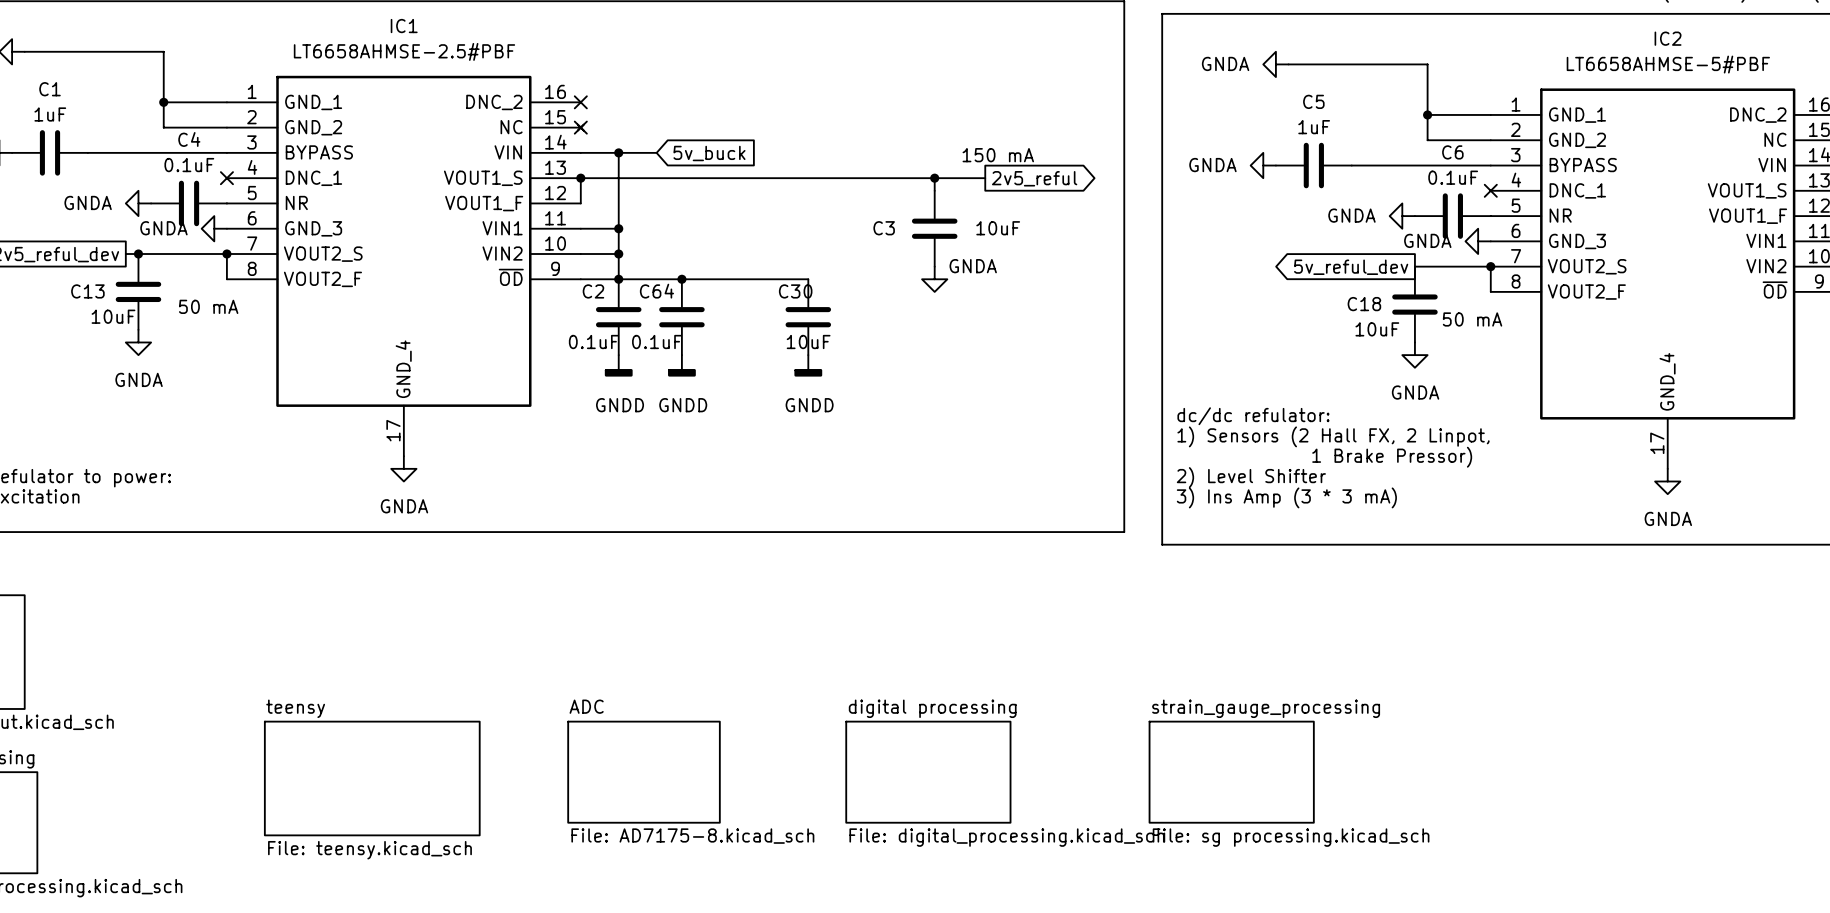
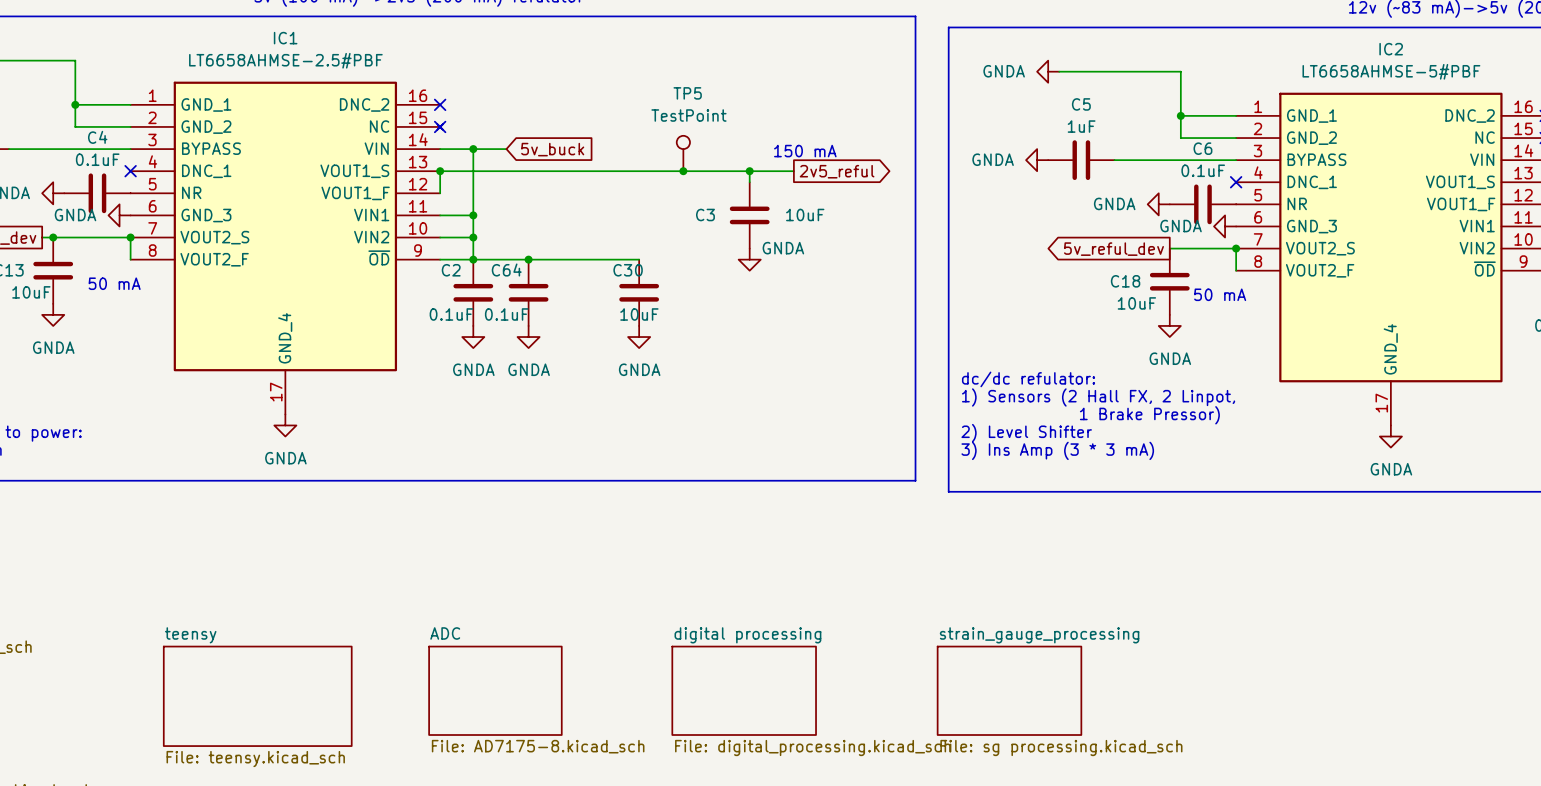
TP5: none -> TestPoint (683, 153)
junction: none -> (683, 171)
power symbol: GNDD (618, 365) -> GNDA (473, 337)
power symbol: GNDD (681, 365) -> GNDA (528, 337)
power symbol: GNDD (808, 365) -> GNDA (639, 337)

